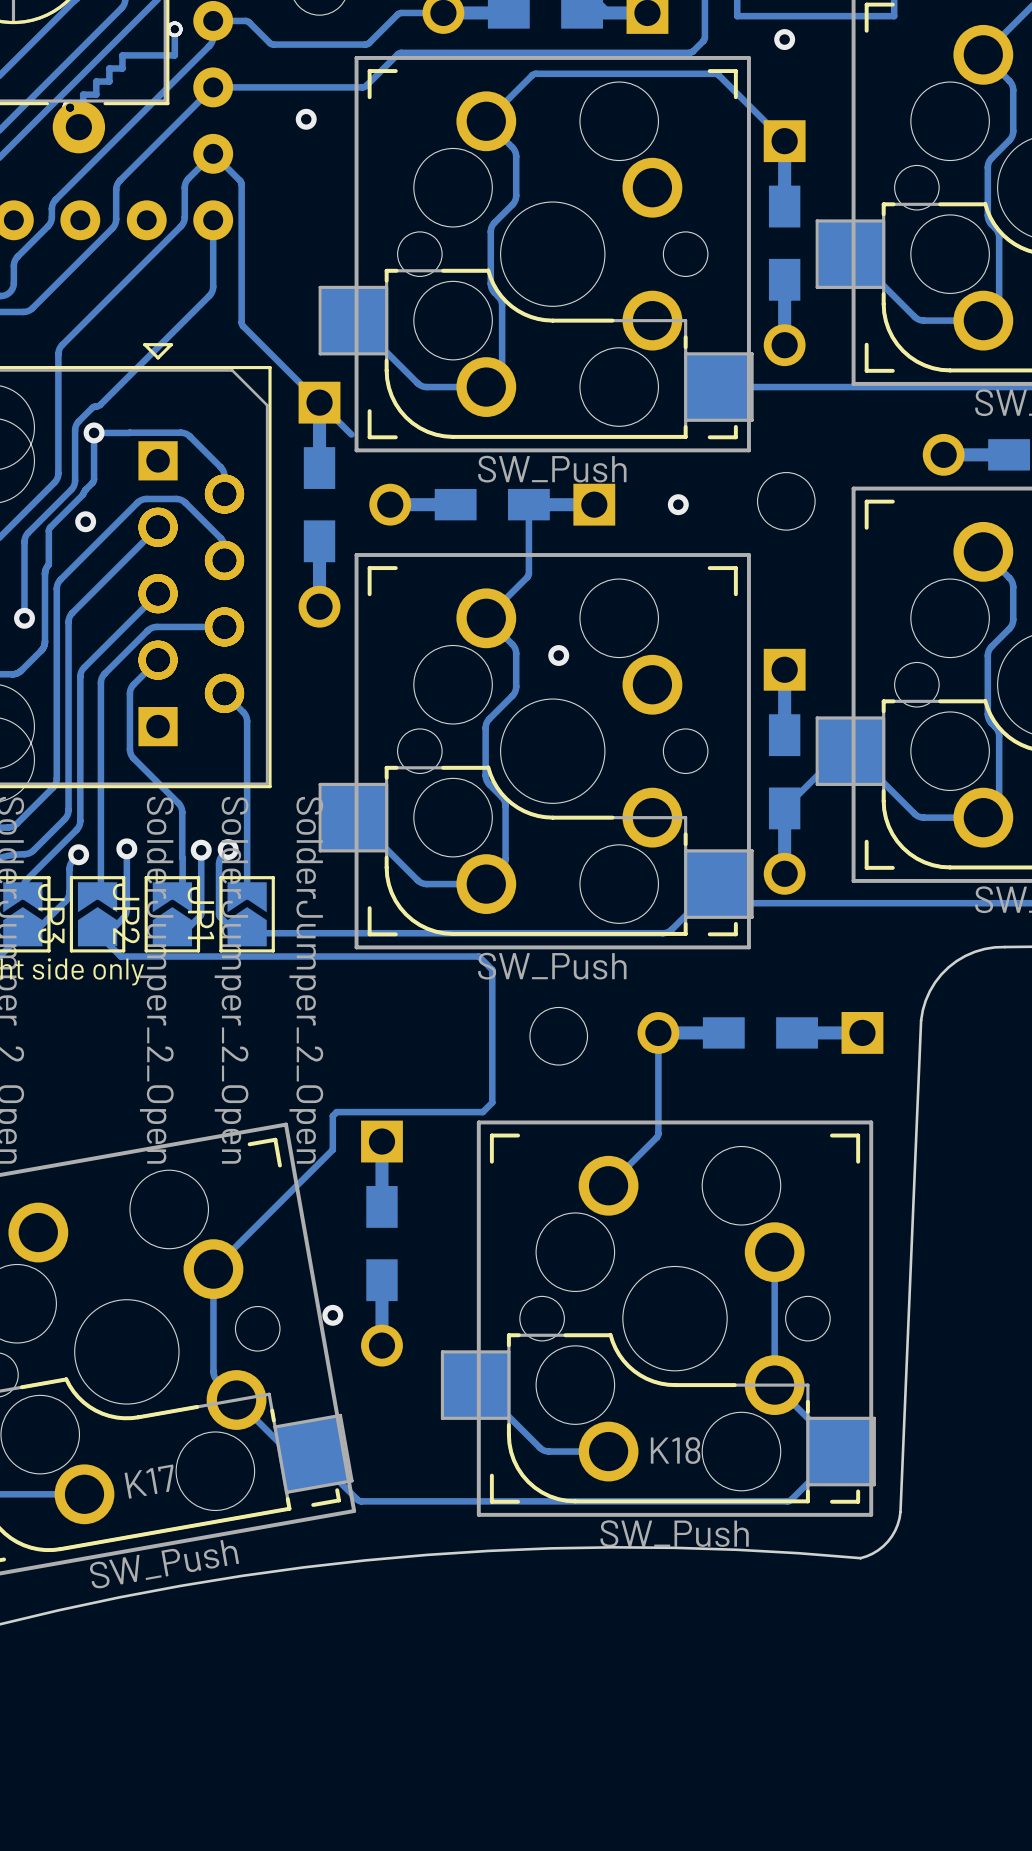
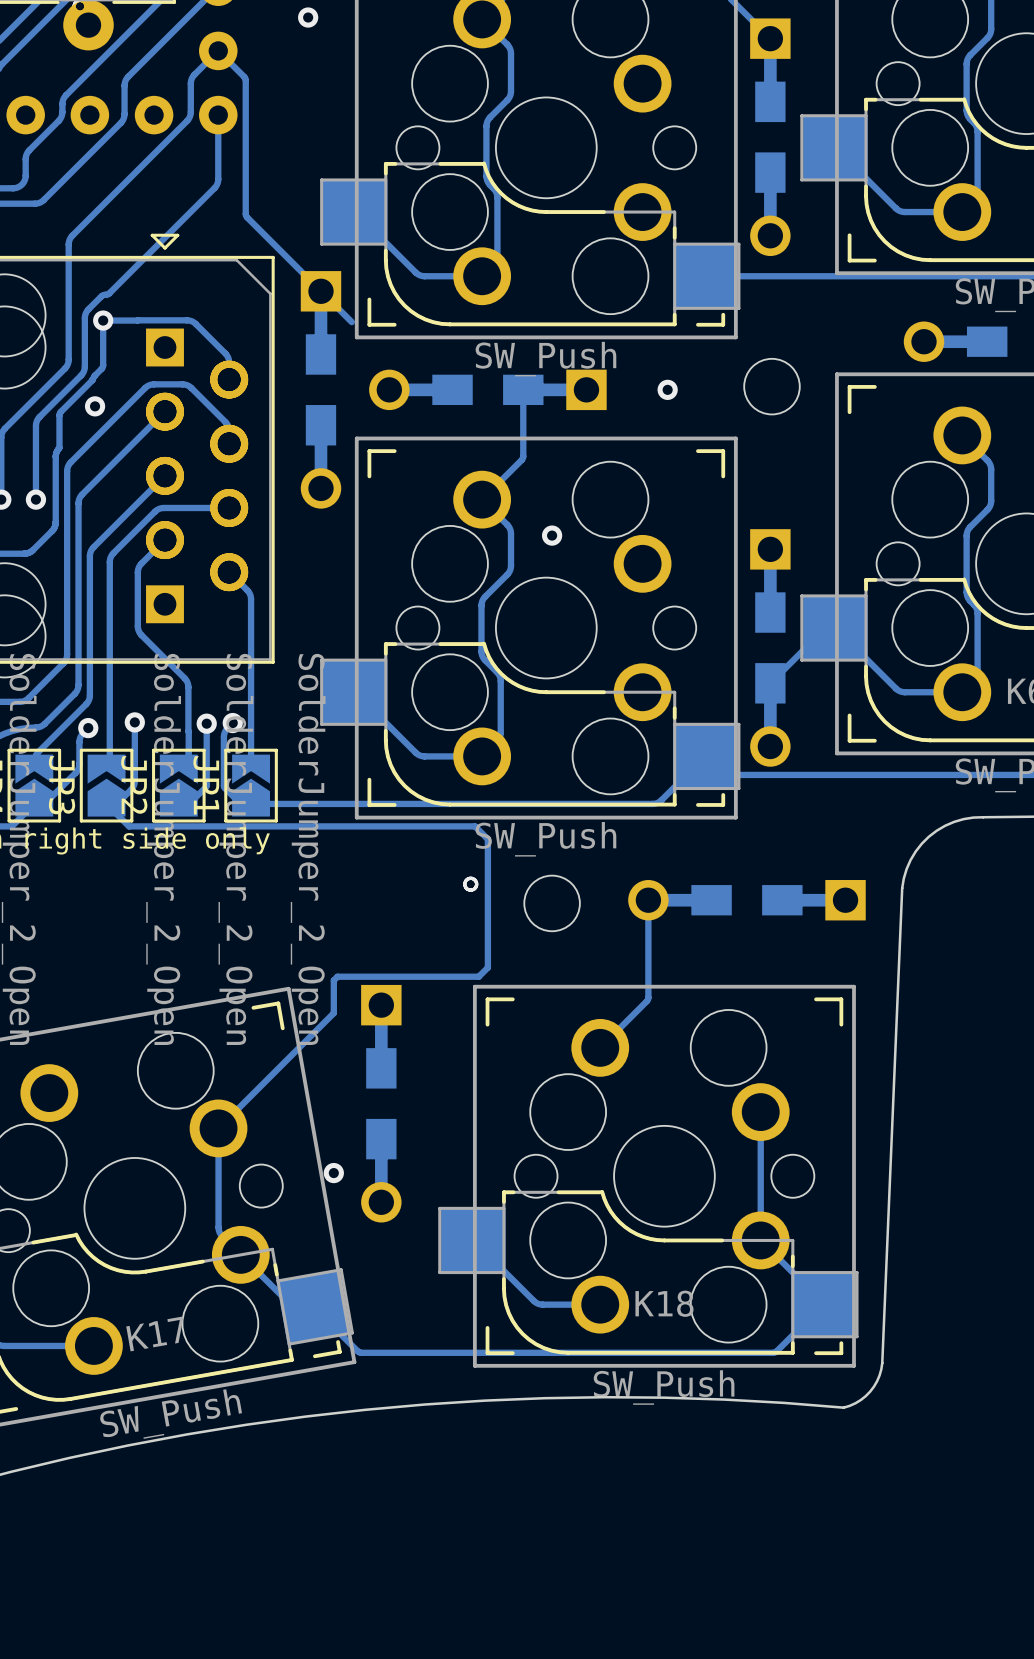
via: none -> (470, 884)

